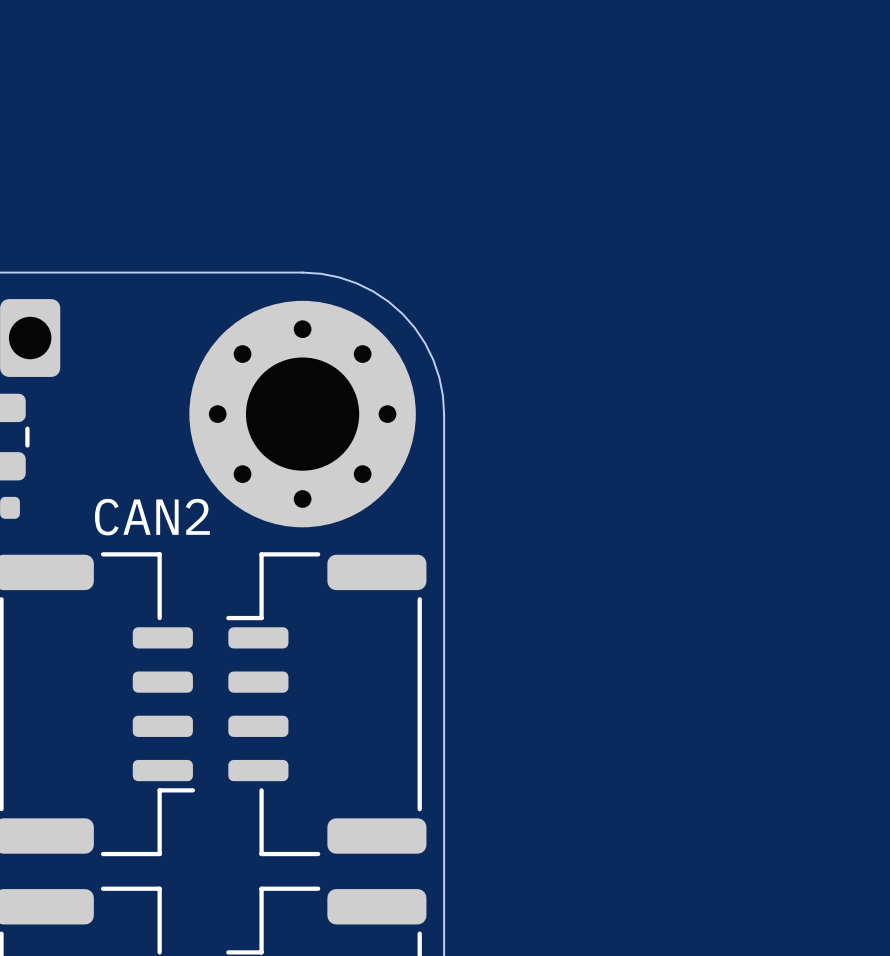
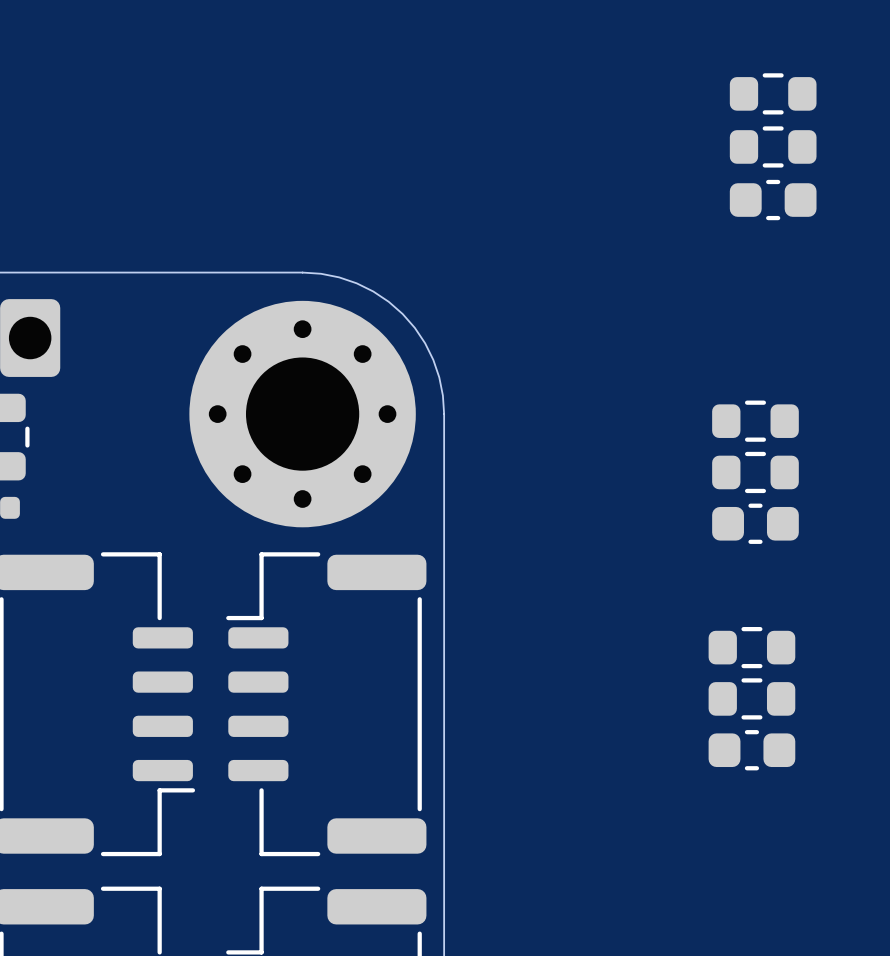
part: none -> (773, 93)
part: none -> (773, 146)
part: none -> (773, 200)
part: none -> (755, 421)
part: none -> (755, 472)
text: CAN2 (152, 517) -> none
part: none -> (755, 523)
part: none -> (751, 647)
part: none -> (751, 698)
part: none -> (751, 750)

